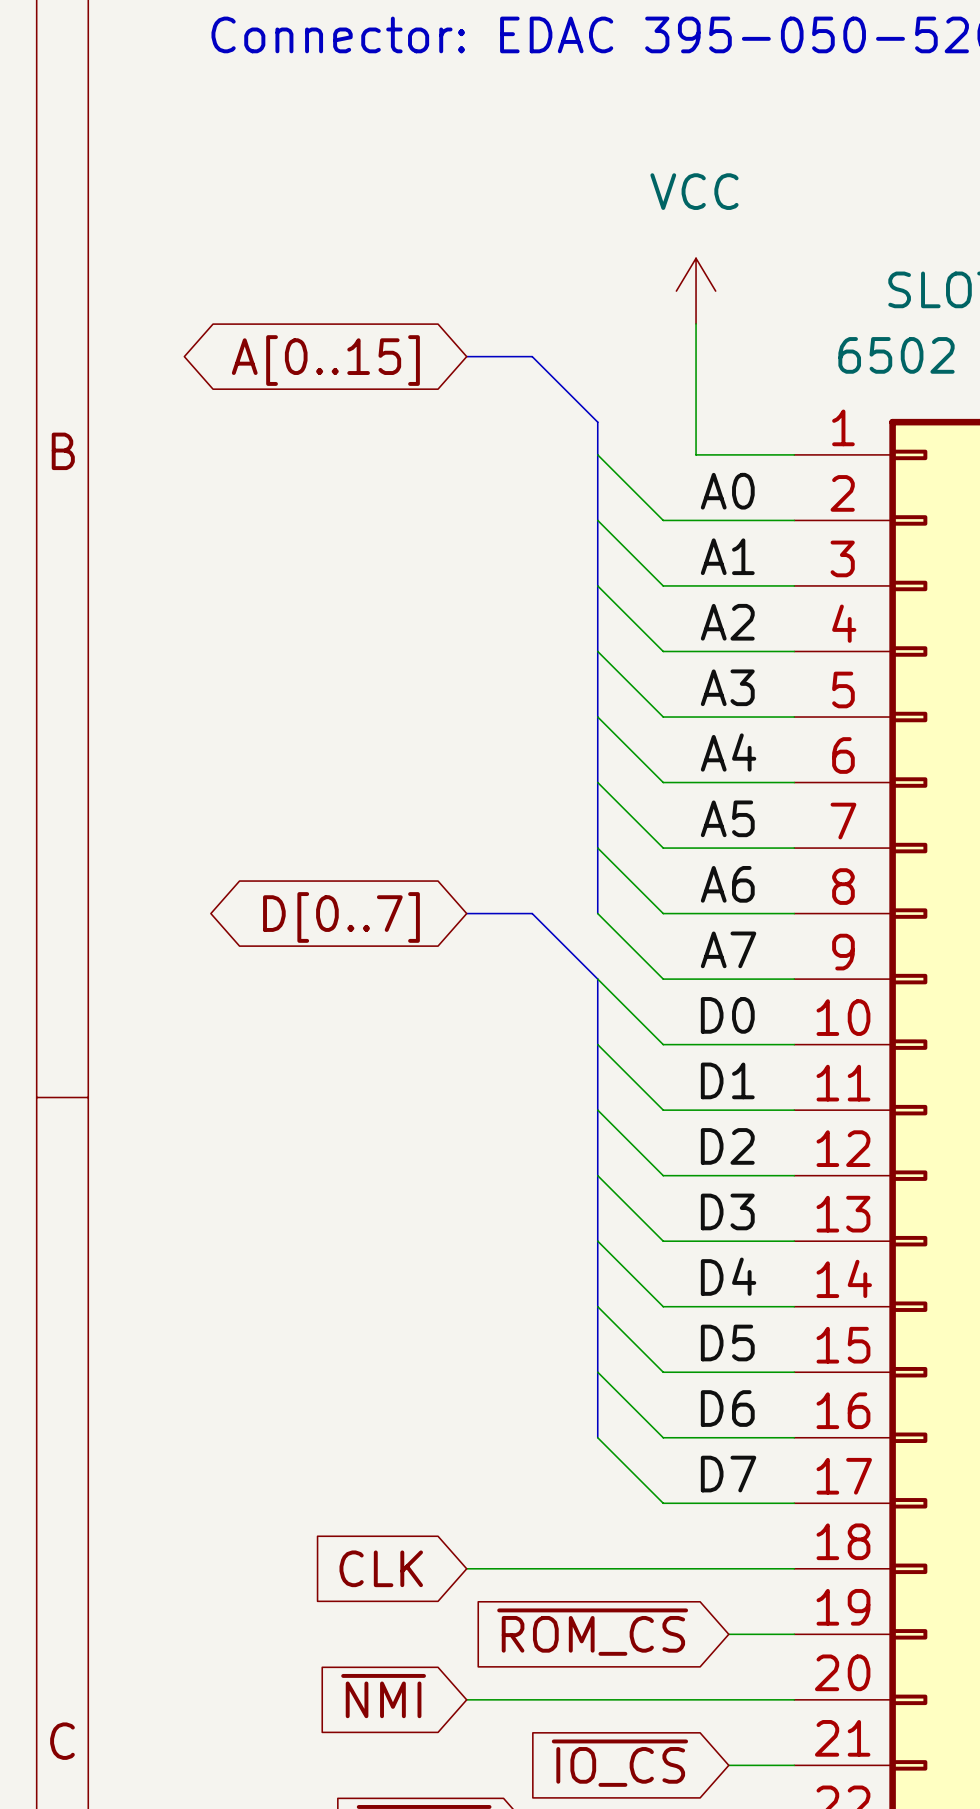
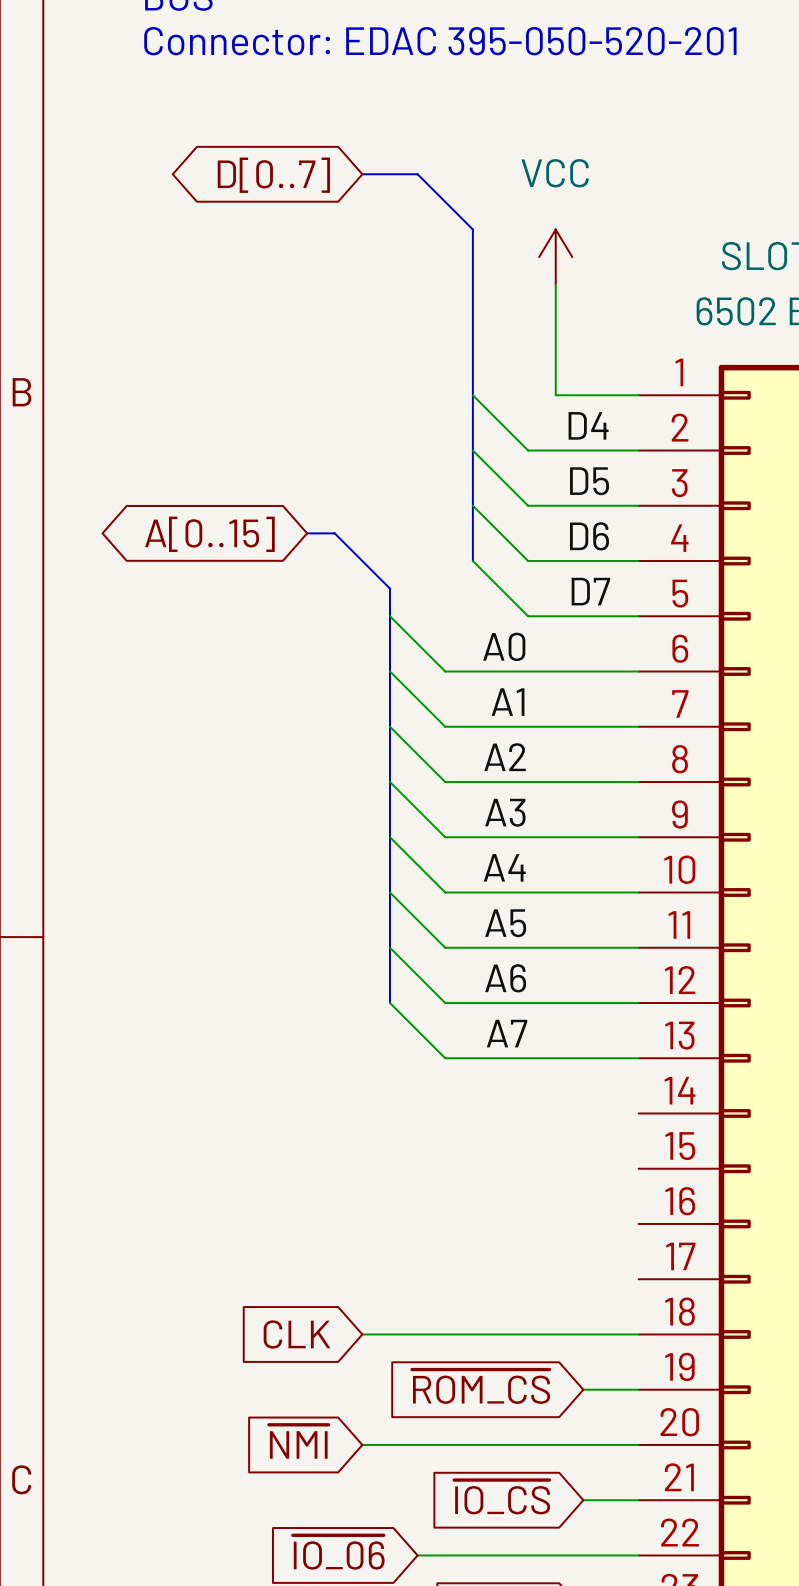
global label: none -> D[0..7] (273, 175)
bus: (466, 356) (532, 356) (597, 422) -> (362, 174) (417, 174) (472, 229) (472, 367)
global label position: A[0..15] (325, 360) -> A[0..15] (209, 534)
label: A0 (727, 491) -> D4 (588, 425)
label: A1 (727, 556) -> D5 (589, 481)
bus: none -> (307, 533) (334, 533) (390, 588) (390, 1002)
label: A2 (727, 622) -> D6 (589, 536)
bus: (597, 651) (597, 913) -> none
label: A3 (727, 687) -> D7 (590, 591)
wire: (597, 717) (663, 782) -> (390, 616) (445, 671) (528, 671)
label position: A4 (728, 752) -> A4 (504, 867)
label: none -> A0 (504, 646)
wire: (597, 782) (663, 848) -> (390, 671) (445, 726) (528, 726)
label: none -> A1 (508, 702)
label position: A5 (727, 818) -> A5 (505, 923)
wire: (597, 848) (663, 913) -> (390, 726) (445, 782) (528, 782)
label: none -> A2 (505, 757)
label position: A6 (727, 884) -> A6 (505, 978)
bus: (466, 913) (532, 913) (597, 979) (597, 1437) -> none
wire: (597, 913) (663, 979) -> (390, 782) (445, 837) (528, 837)
global label: D[0..7] (341, 917) -> none
label: none -> A3 (505, 812)
label position: A7 (728, 949) -> A7 (507, 1033)
wire: (597, 979) (663, 1044) -> (390, 837) (445, 892) (528, 892)
label: D0 (727, 1015) -> none
wire: (597, 1044) (663, 1110) -> (390, 892) (445, 947) (528, 947)
label: D1 (727, 1080) -> none
wire: (597, 1110) (663, 1175) -> (390, 947) (445, 1002) (528, 1002)
label: D2 (727, 1146) -> none
wire: (597, 1175) (663, 1241) -> (390, 1002) (445, 1058) (528, 1058)
label: D3 (727, 1211) -> none
wire: (597, 1241) (663, 1306) (794, 1306) -> none
label: D4 (728, 1276) -> none
wire: (597, 1306) (663, 1372) (794, 1372) -> none
label: D5 (727, 1343) -> none
wire: (597, 1372) (663, 1437) (794, 1437) -> none
label: D6 (727, 1408) -> none
wire: (597, 1437) (663, 1503) (794, 1503) -> none
label: D7 (728, 1474) -> none

